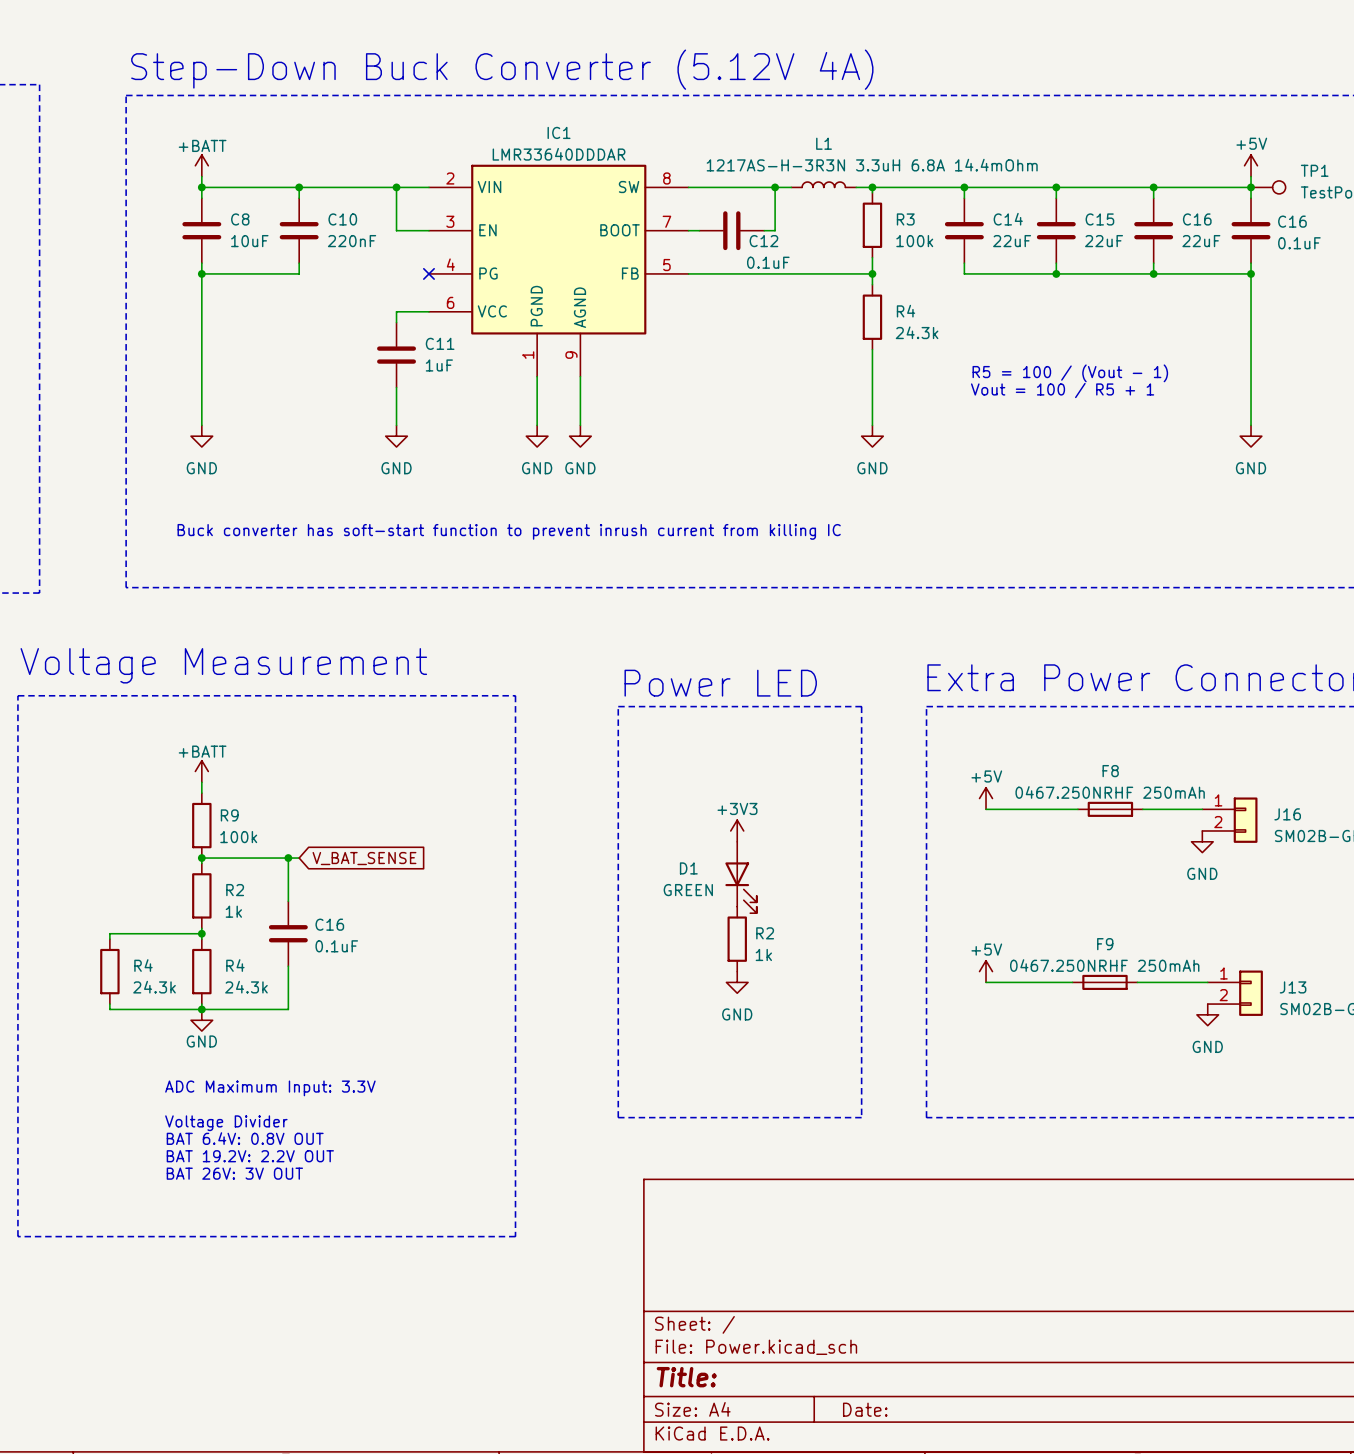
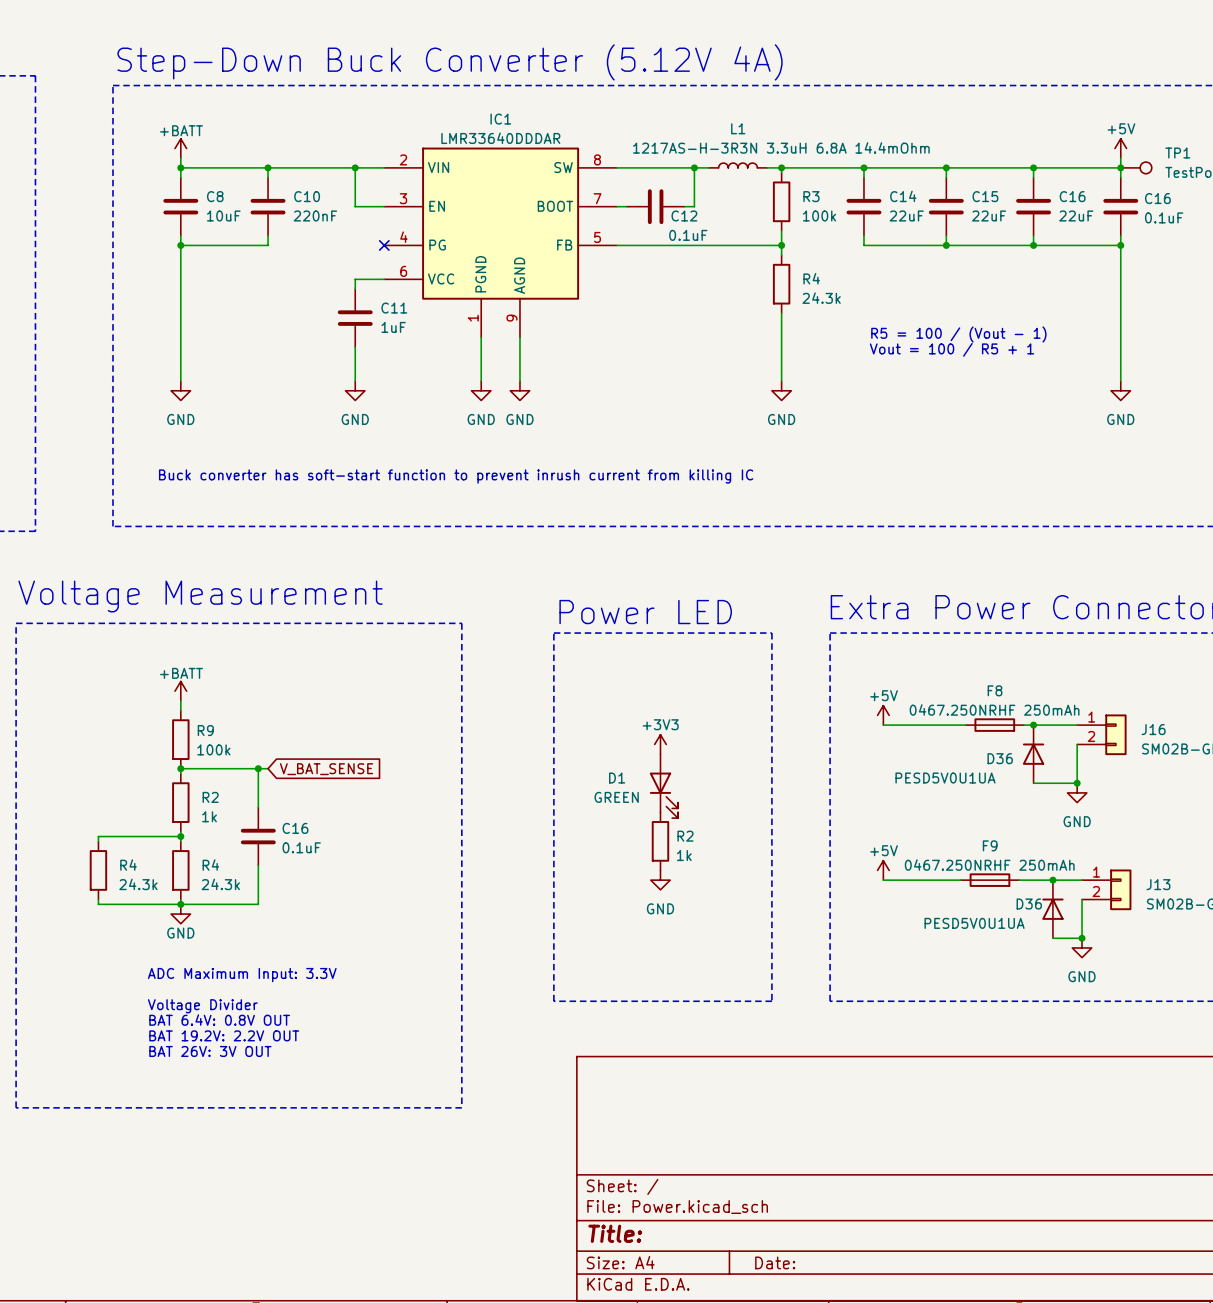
junction: none -> (1033, 725)
wire: none -> (1077, 744) (1077, 783) (1033, 783)
D36: none -> PESD5V0U1UA (1033, 754)
power symbol position: GND (1202, 841) -> GND (1077, 792)
junction: none -> (1077, 783)
junction: none -> (1052, 880)
wire: none -> (1082, 899) (1082, 938) (1052, 938)
D36: none -> PESD5V0U1UA (1052, 909)
power symbol position: GND (1207, 1014) -> GND (1082, 947)
junction: none -> (1082, 938)

